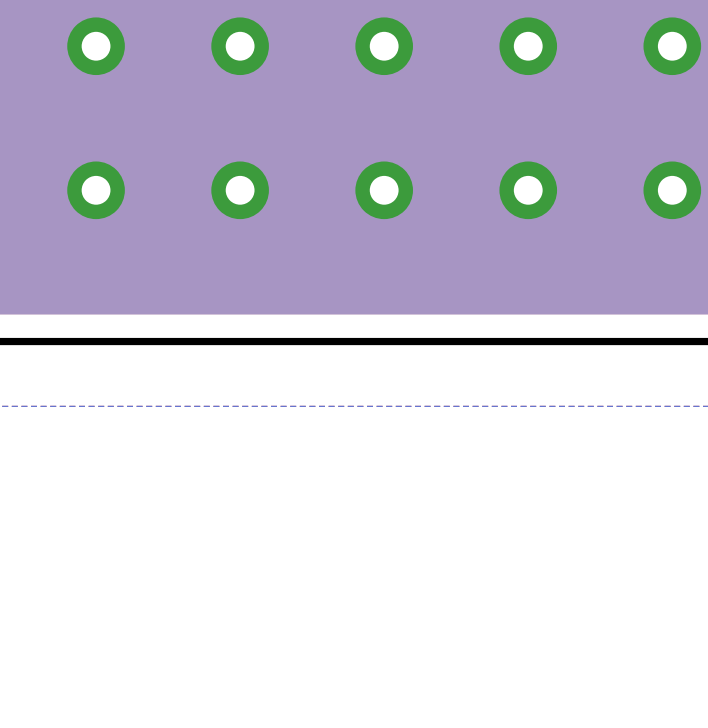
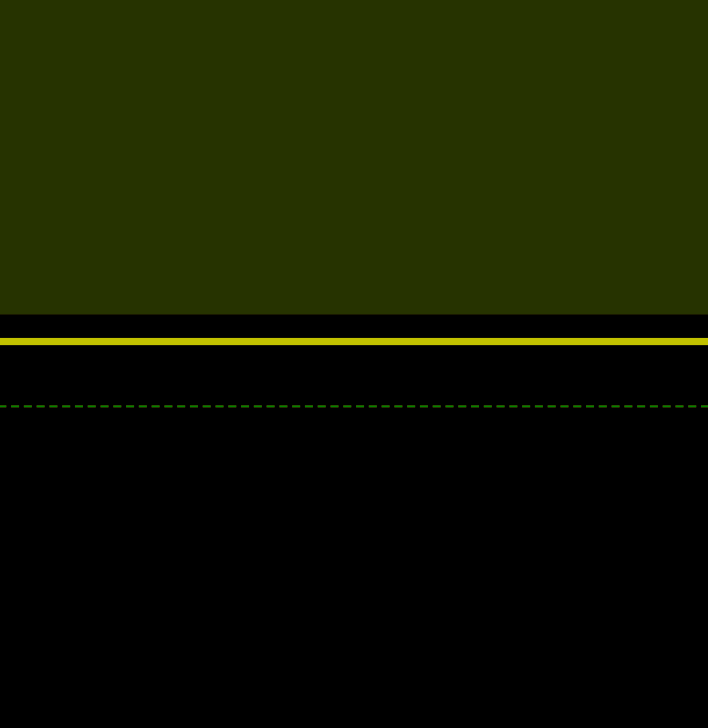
via: (96, 46) -> none
via: (240, 46) -> none
via: (384, 46) -> none
via: (528, 46) -> none
via: (672, 46) -> none
via: (96, 190) -> none
via: (240, 190) -> none
via: (384, 190) -> none
via: (528, 190) -> none
via: (672, 190) -> none

